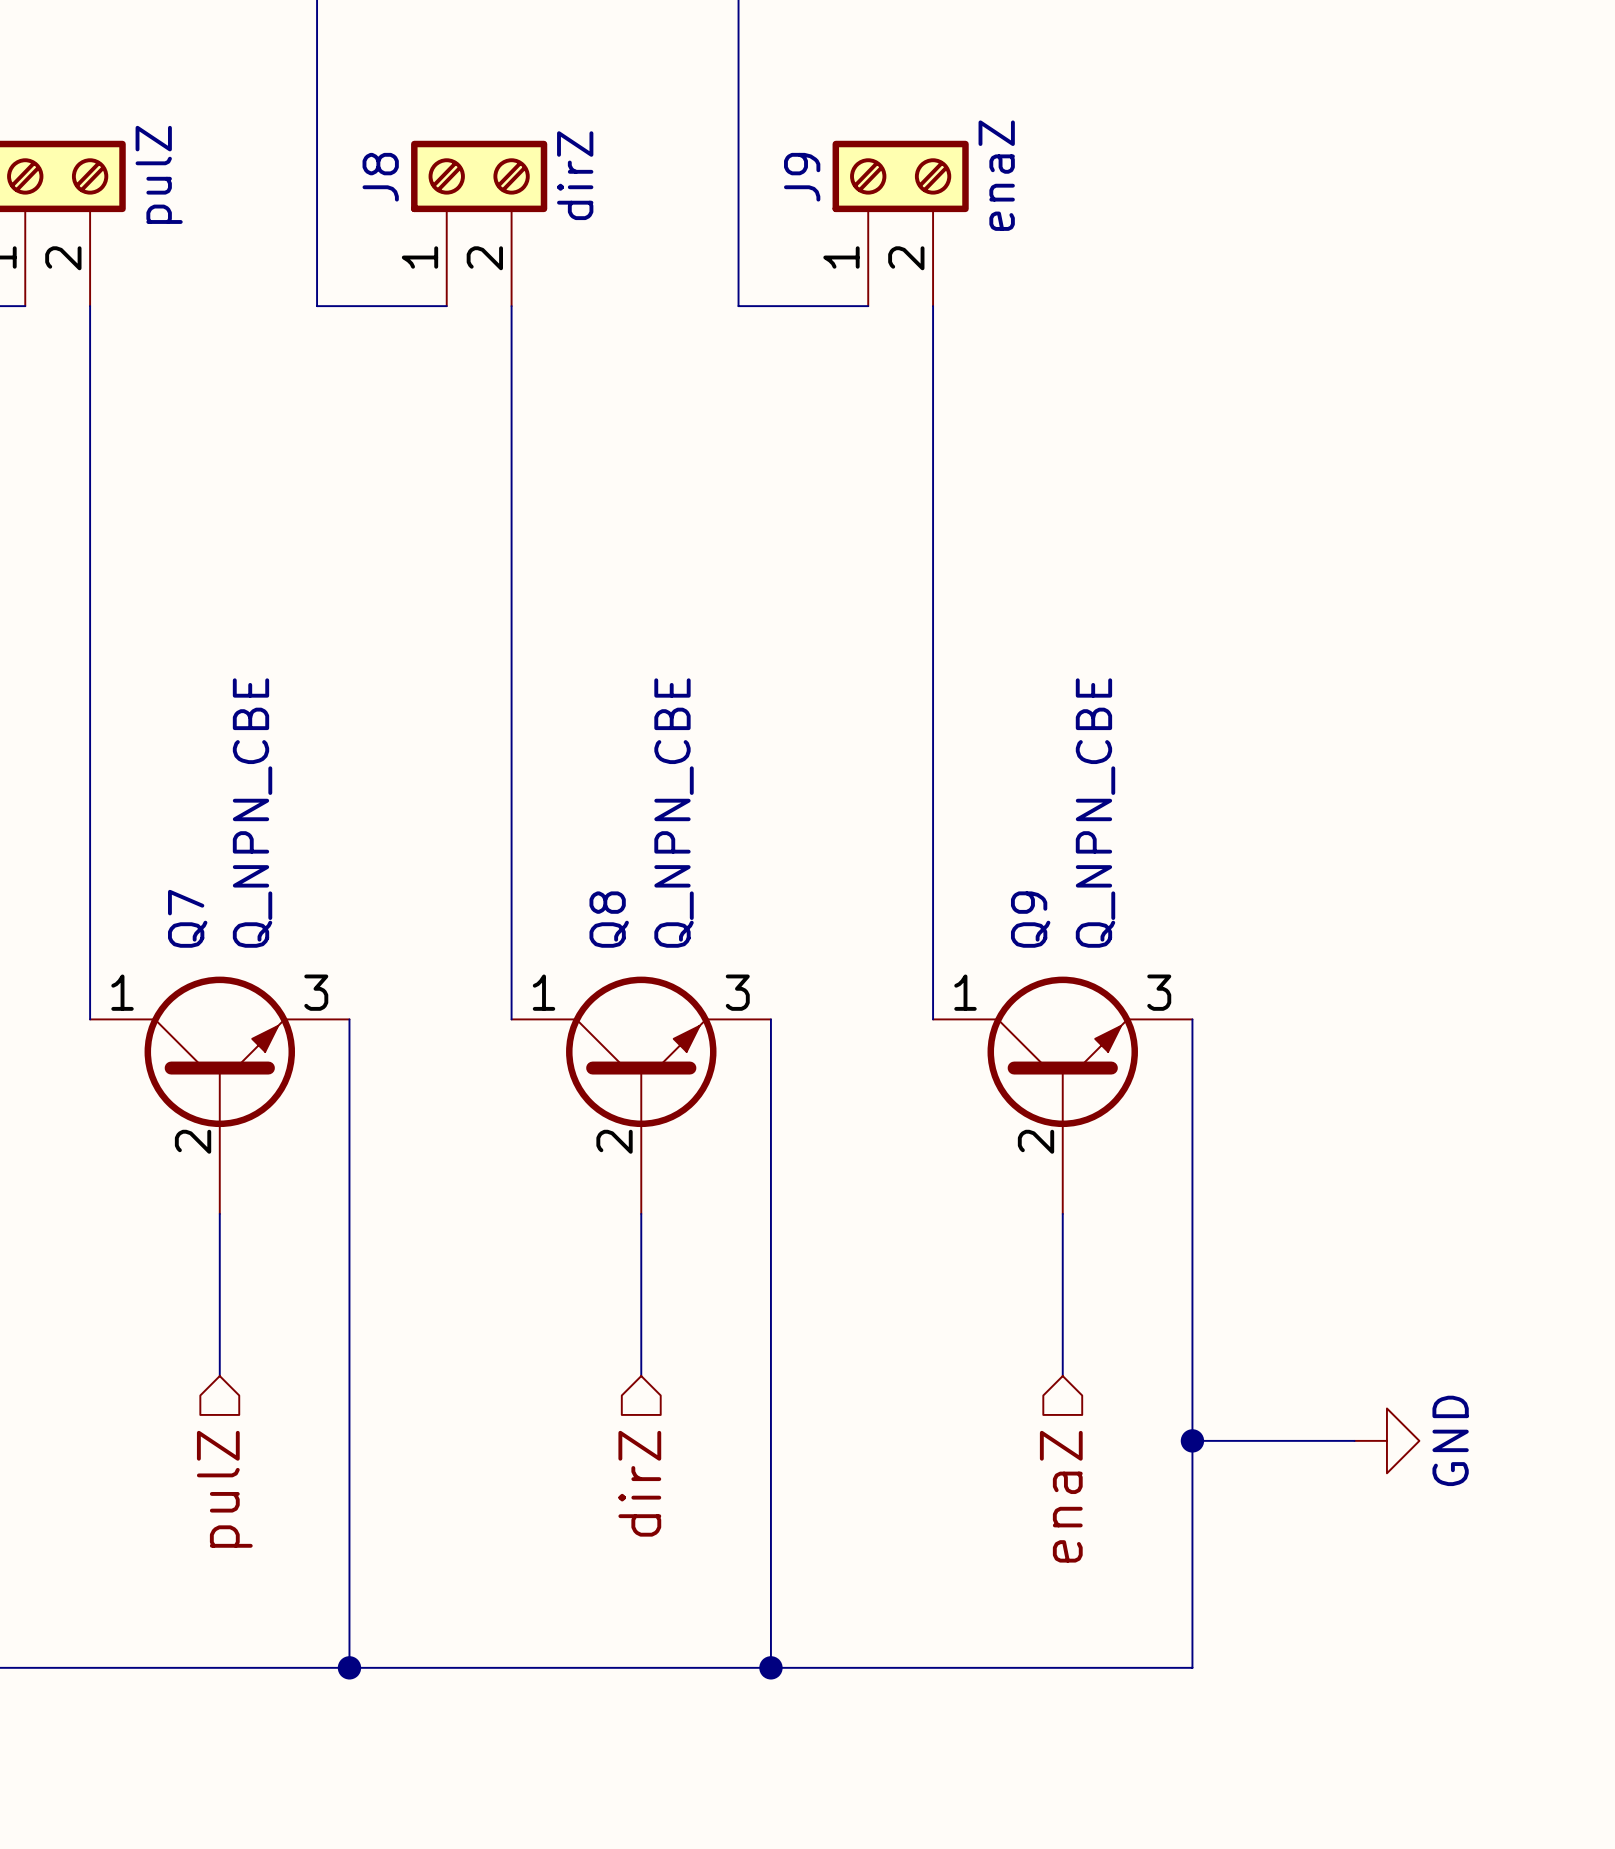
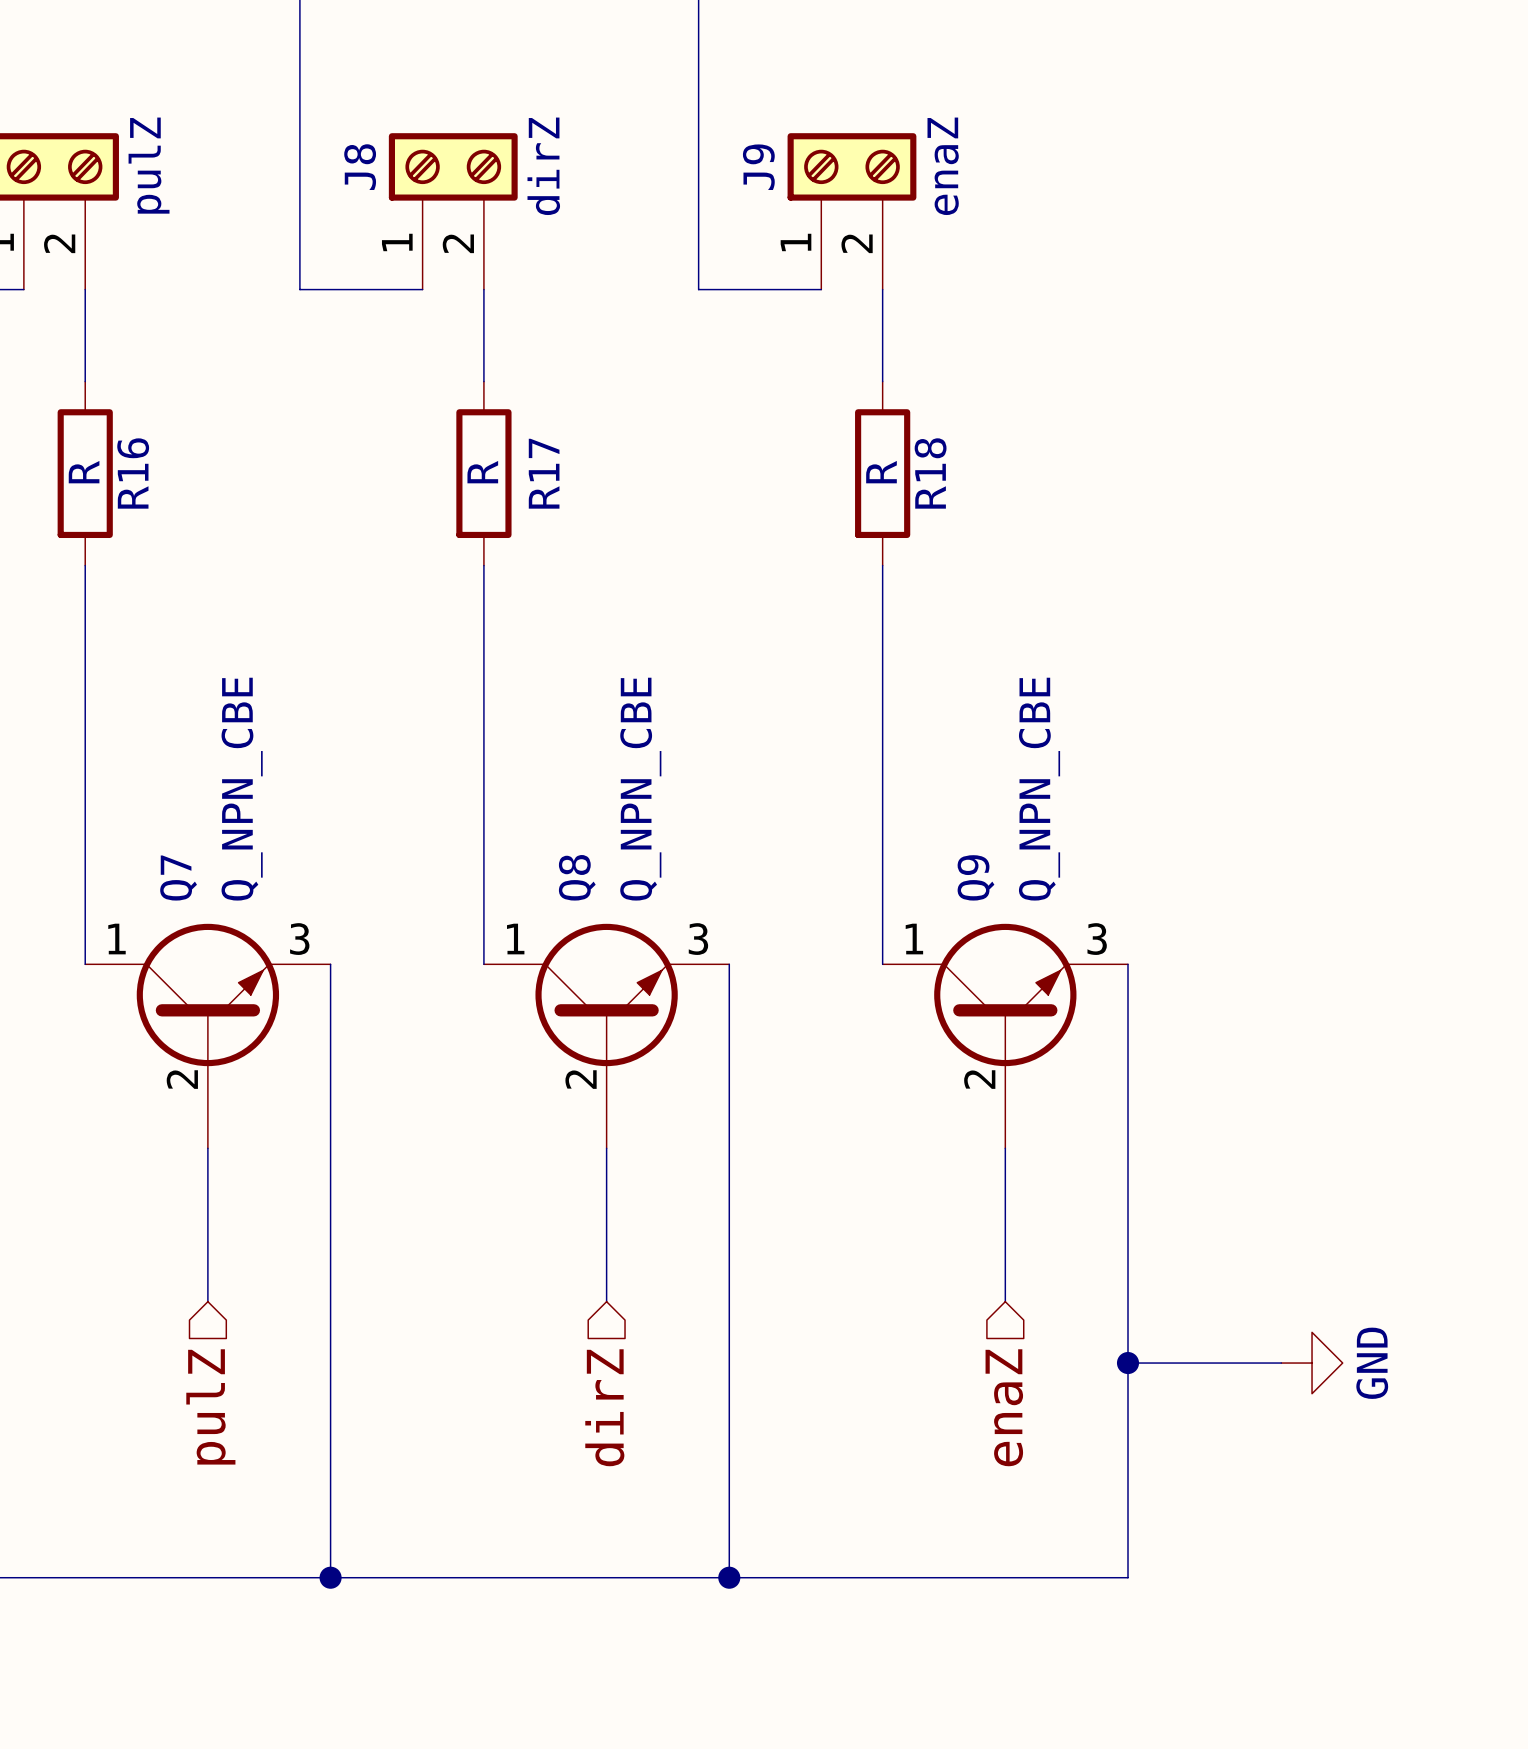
wire: (90, 403) (90, 597) -> none
wire: (511, 403) (511, 597) -> none
wire: (933, 403) (933, 597) -> none
R16: none -> R (85, 473)
R17: none -> R (483, 473)
R18: none -> R (882, 473)

